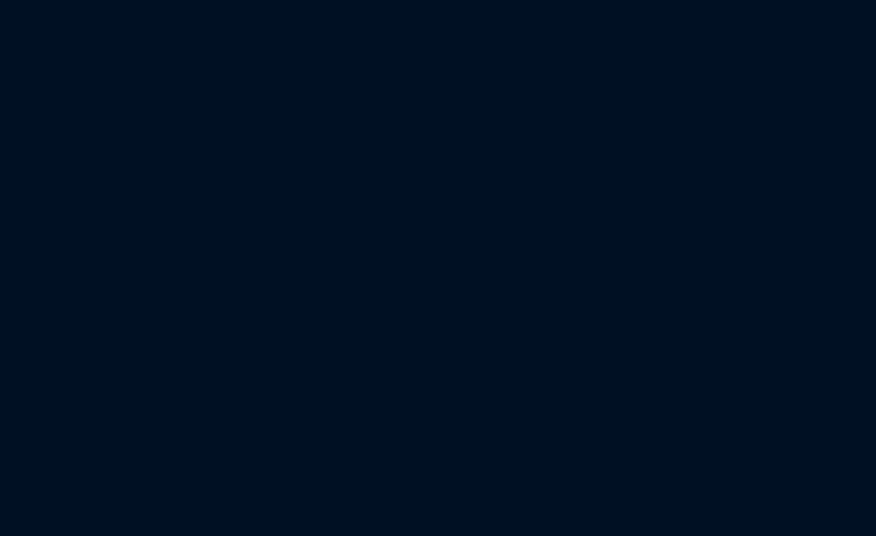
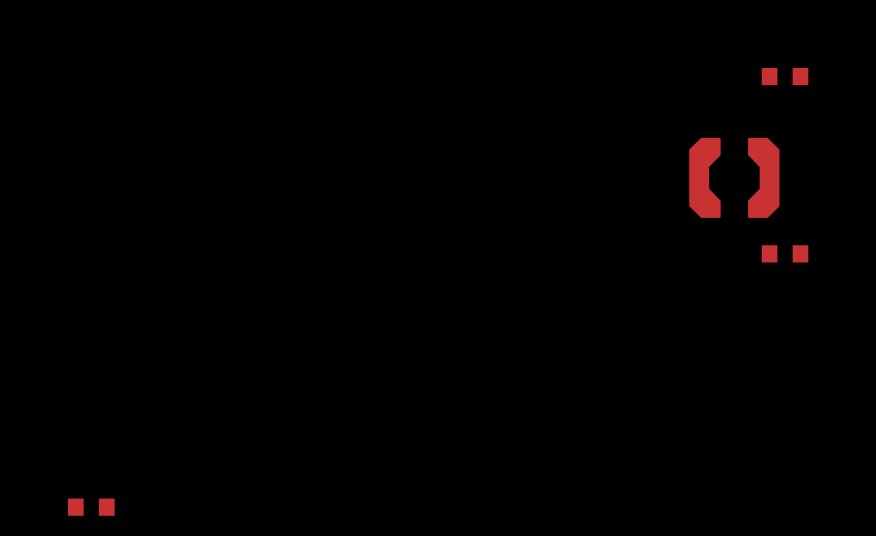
part: none -> (785, 76)
part: none -> (734, 177)
part: none -> (785, 253)
part: none -> (91, 507)

